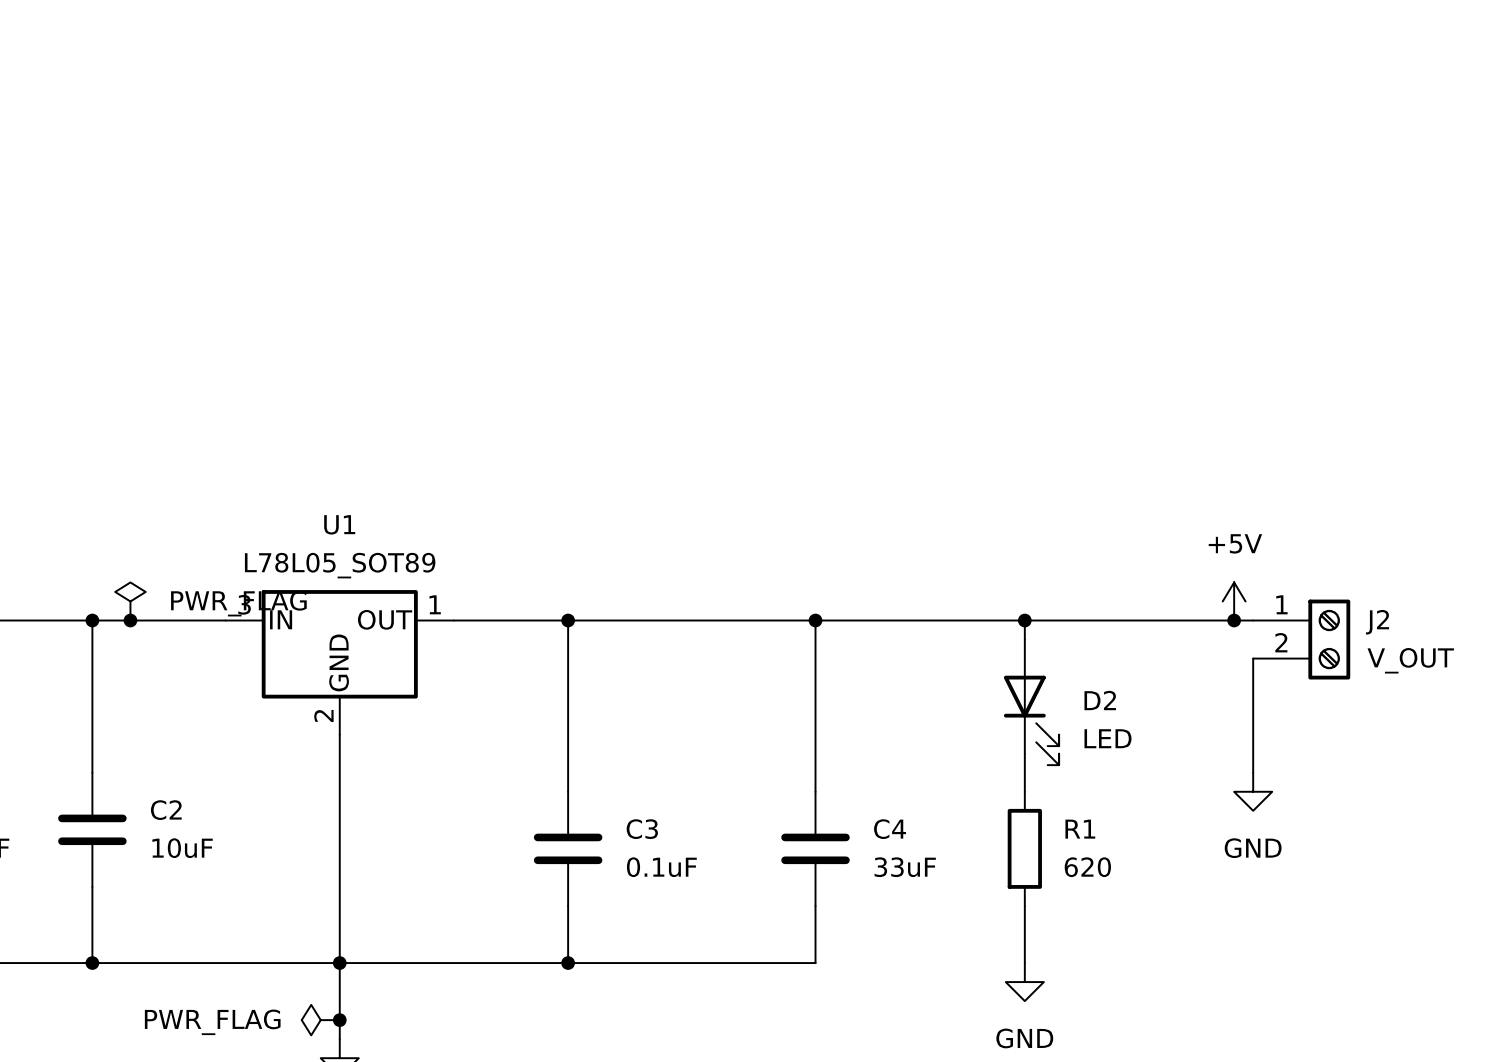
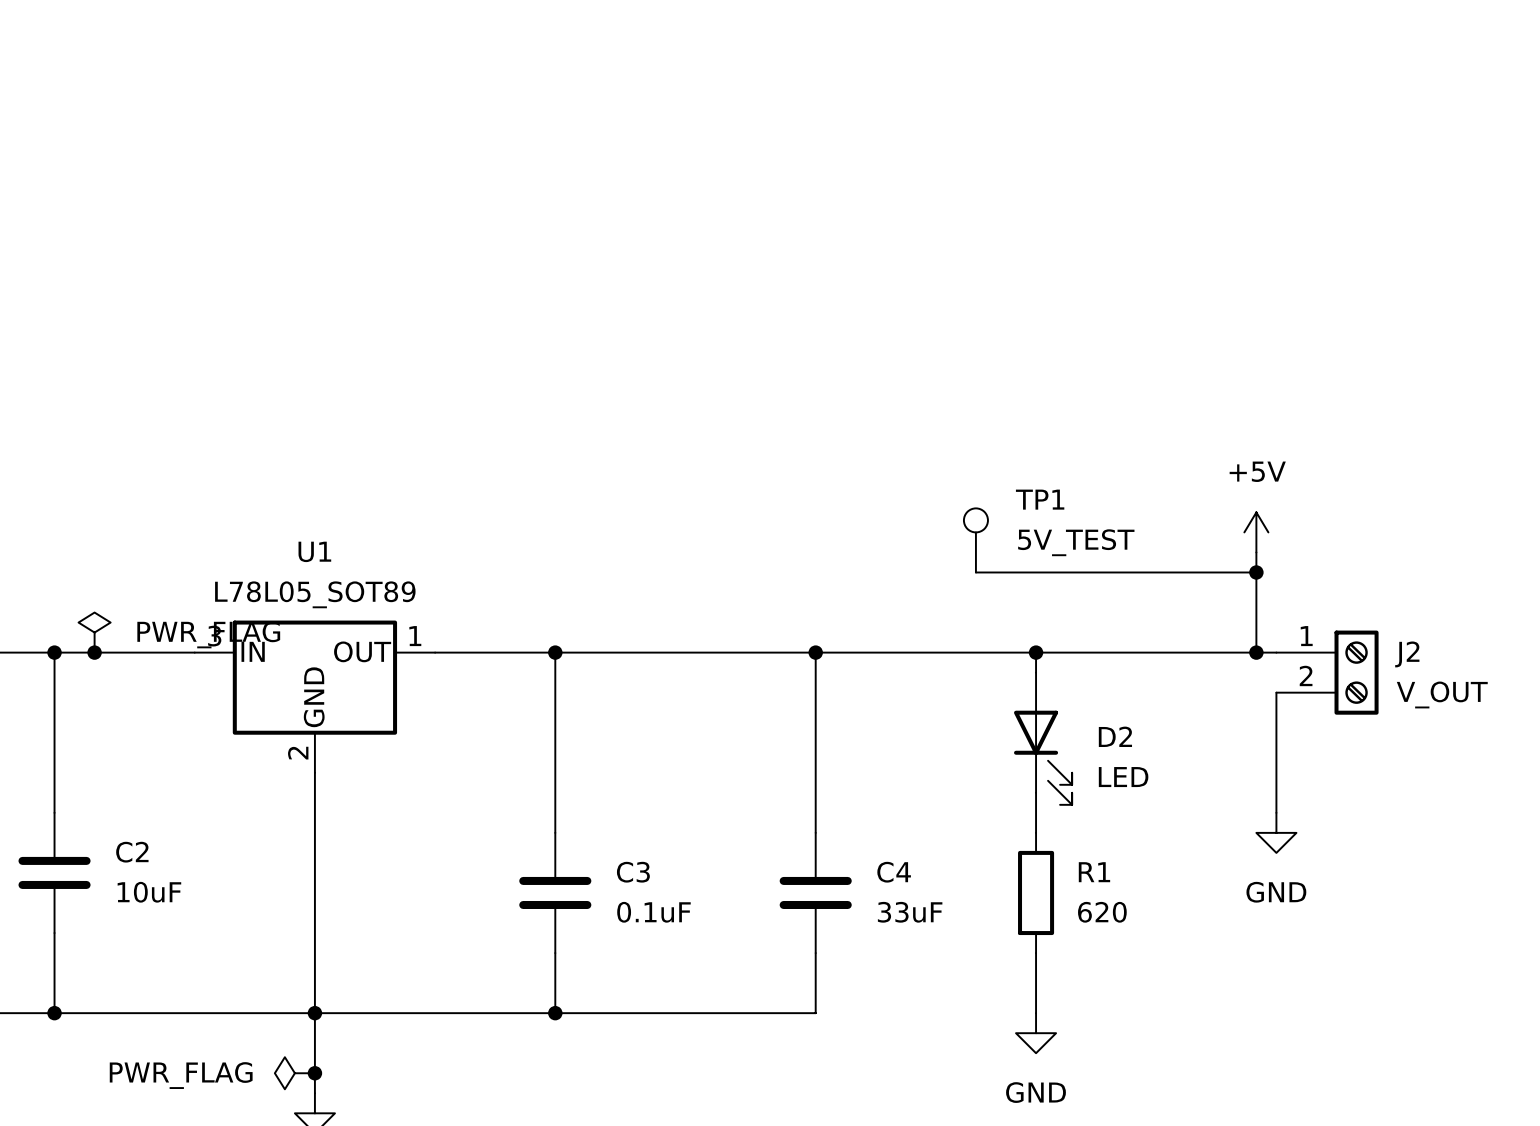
TP1: none -> 5V_TEST (975, 540)
wire: none -> (1256, 552) (1256, 652)
wire: none -> (975, 572) (1256, 572)
junction: none -> (1256, 572)
power symbol position: +5V (1234, 601) -> +5V (1256, 532)

